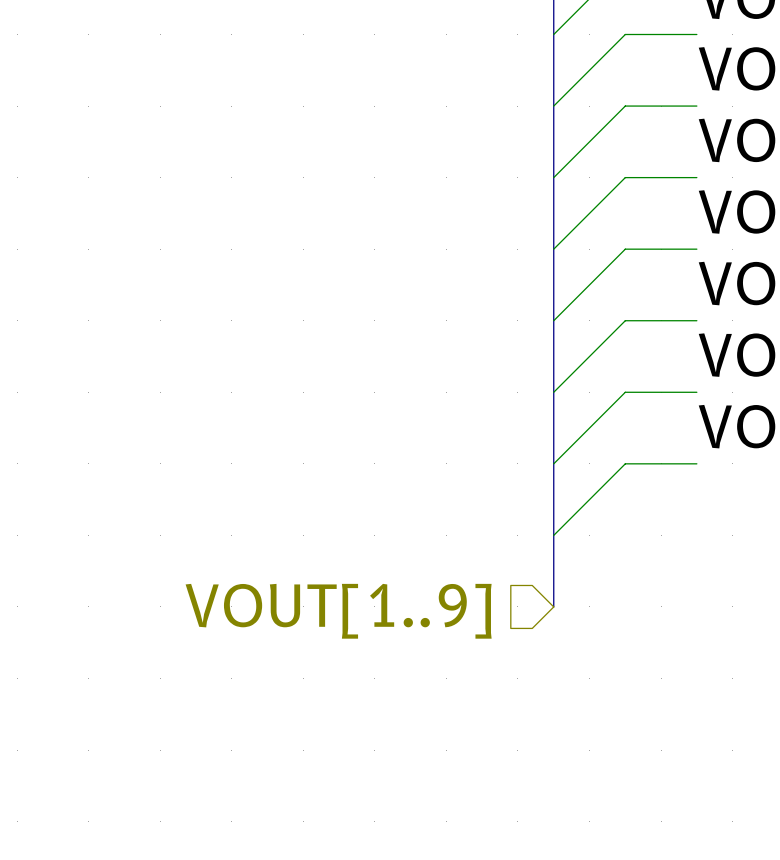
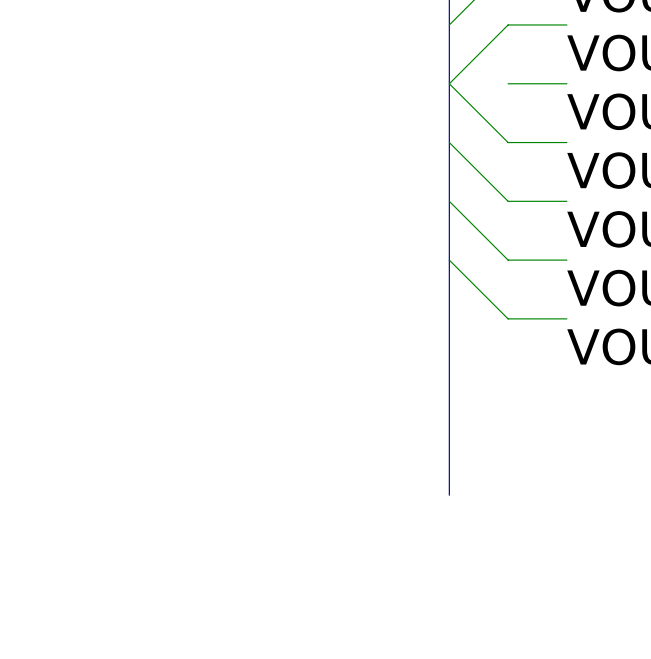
wire: (625, 106) (553, 177) -> (508, 201) (449, 142)
wire: (625, 177) (553, 249) -> (508, 142) (449, 83)
wire: (625, 249) (553, 320) -> (508, 318) (449, 260)
wire: (625, 320) (553, 392) -> (508, 260) (449, 201)
wire: (625, 392) (553, 463) -> none
wire: (696, 463) (625, 463) (553, 535) -> none
hierarchical label: VOUT[1..9] (338, 611) -> none

